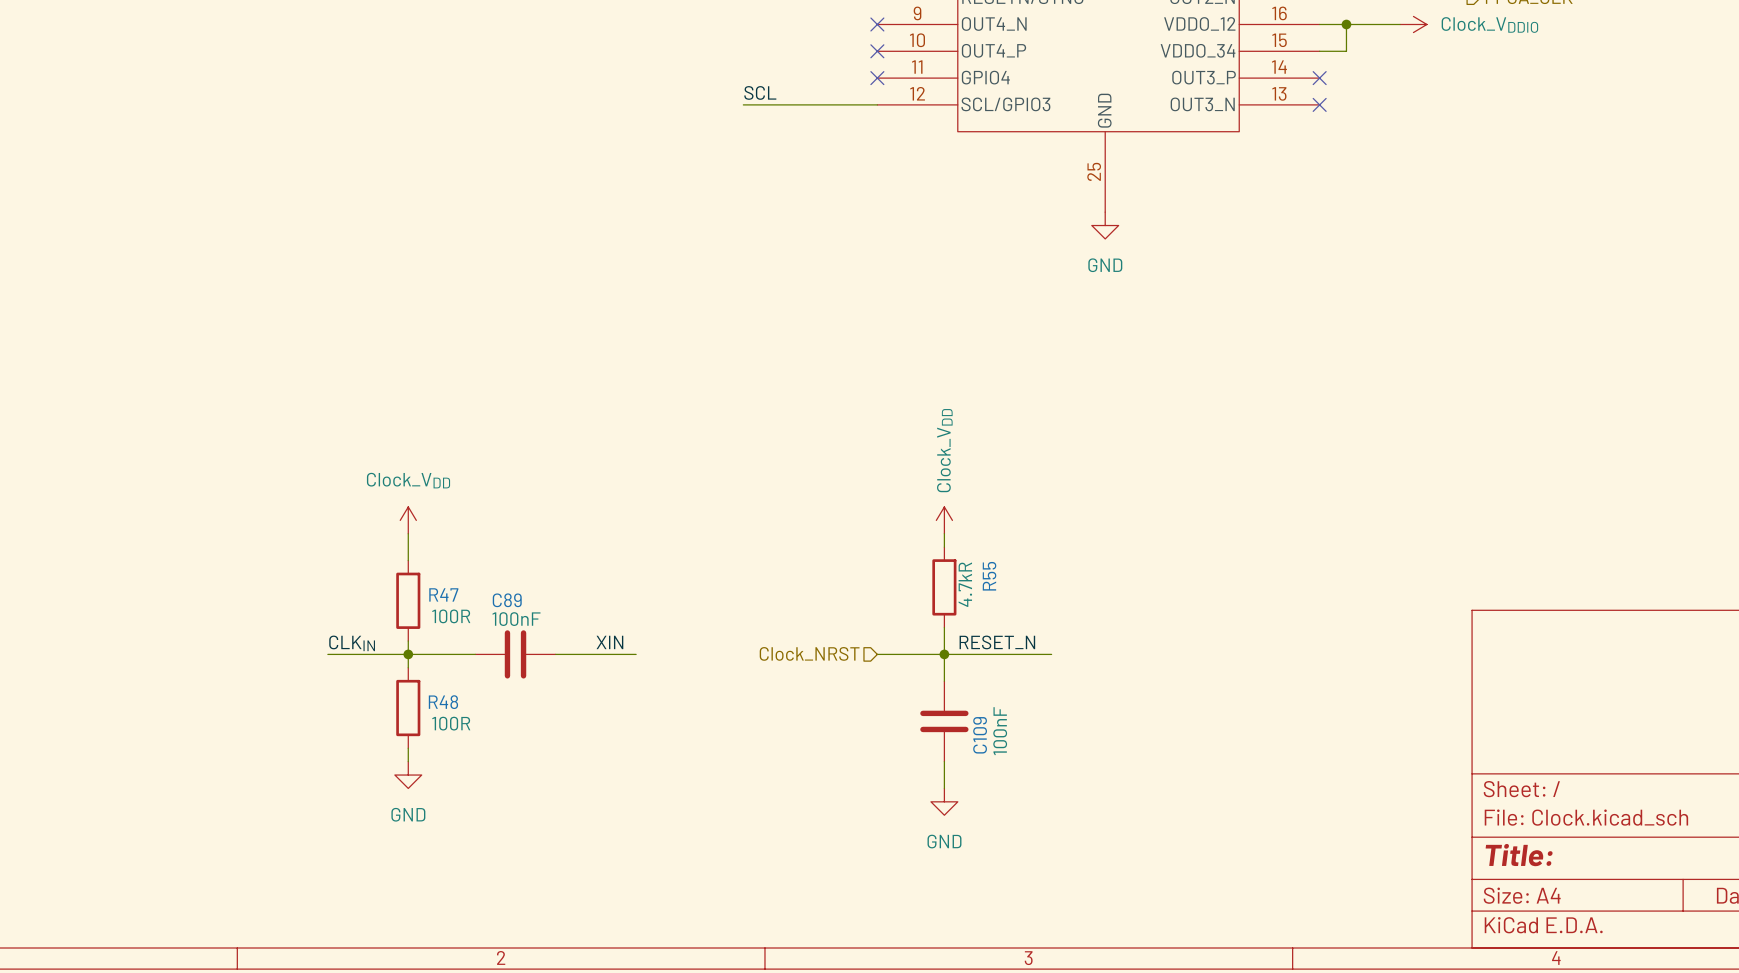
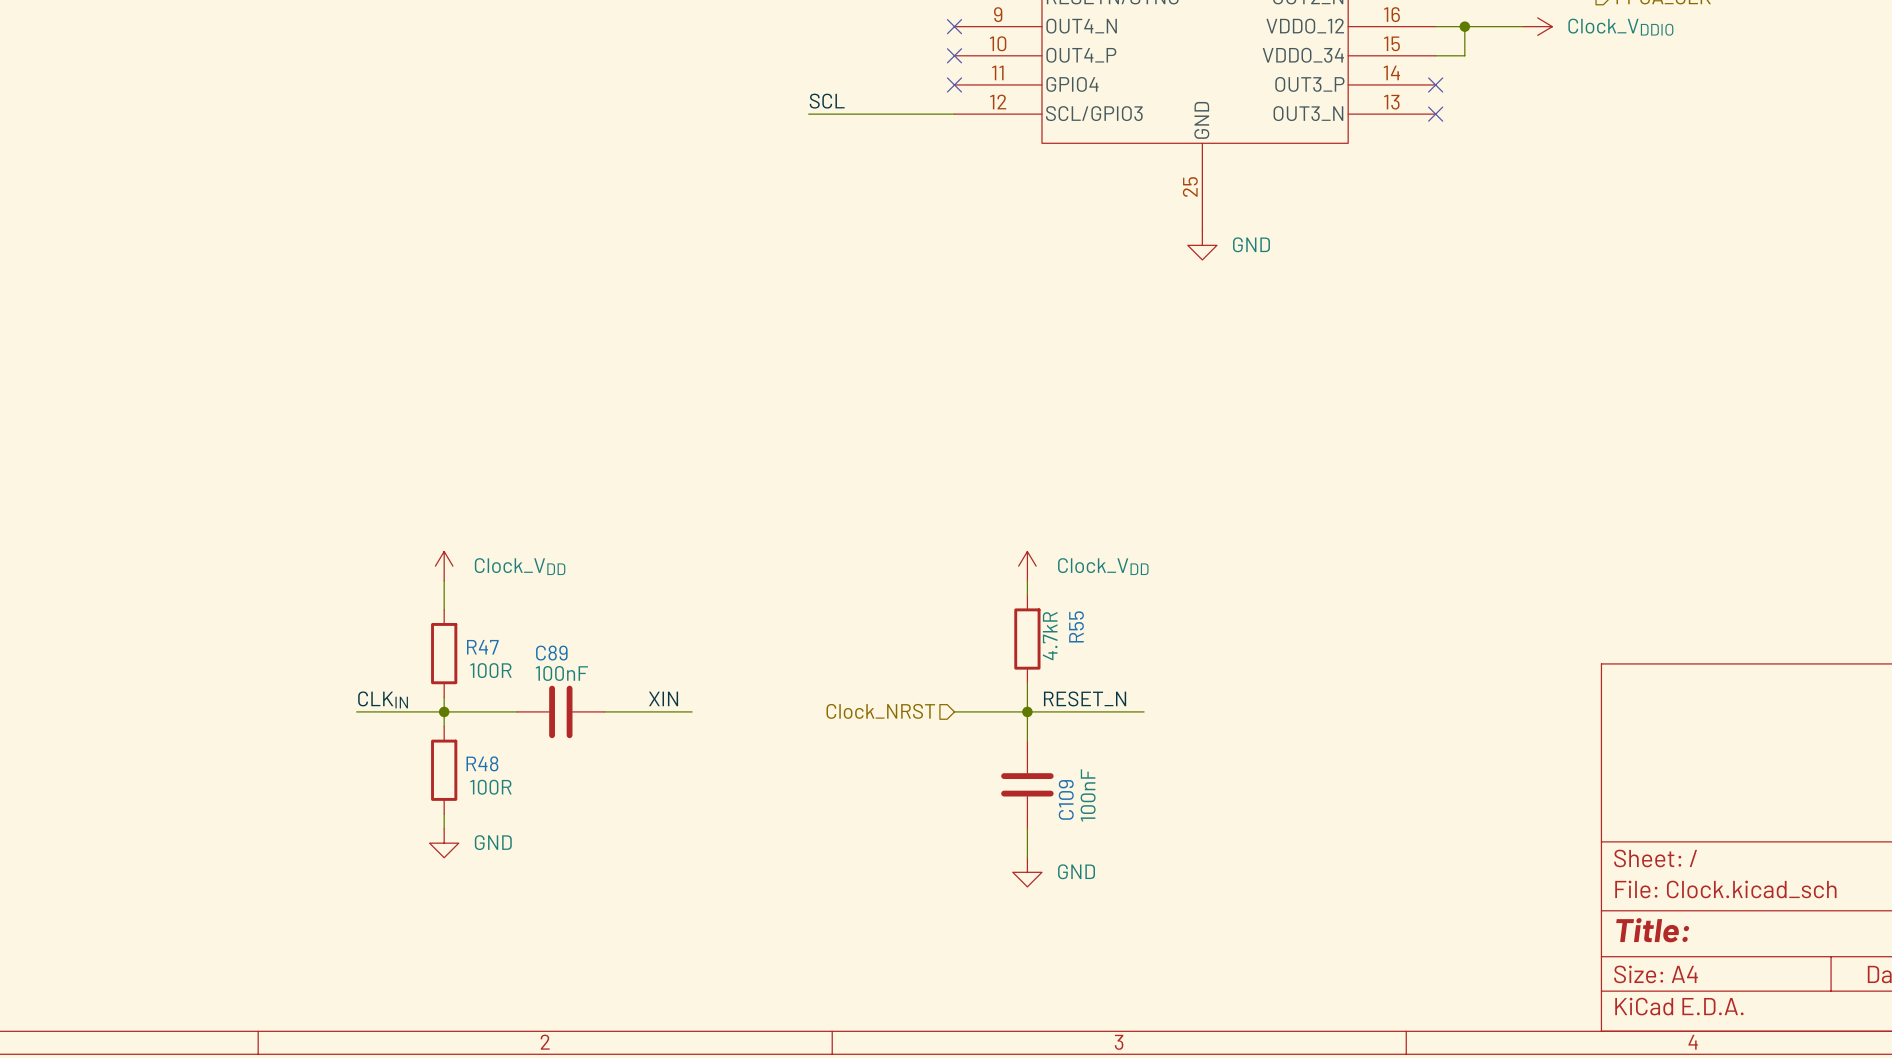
power symbol text position: GND (1105, 265) -> GND (1251, 244)
power symbol text rotation: 0° (944, 450) -> 90° clockwise (1103, 566)
power symbol text position: Clock_VDD (408, 480) -> Clock_VDD (520, 566)
power symbol text position: GND (408, 814) -> GND (493, 842)
power symbol text position: GND (944, 841) -> GND (1076, 871)

